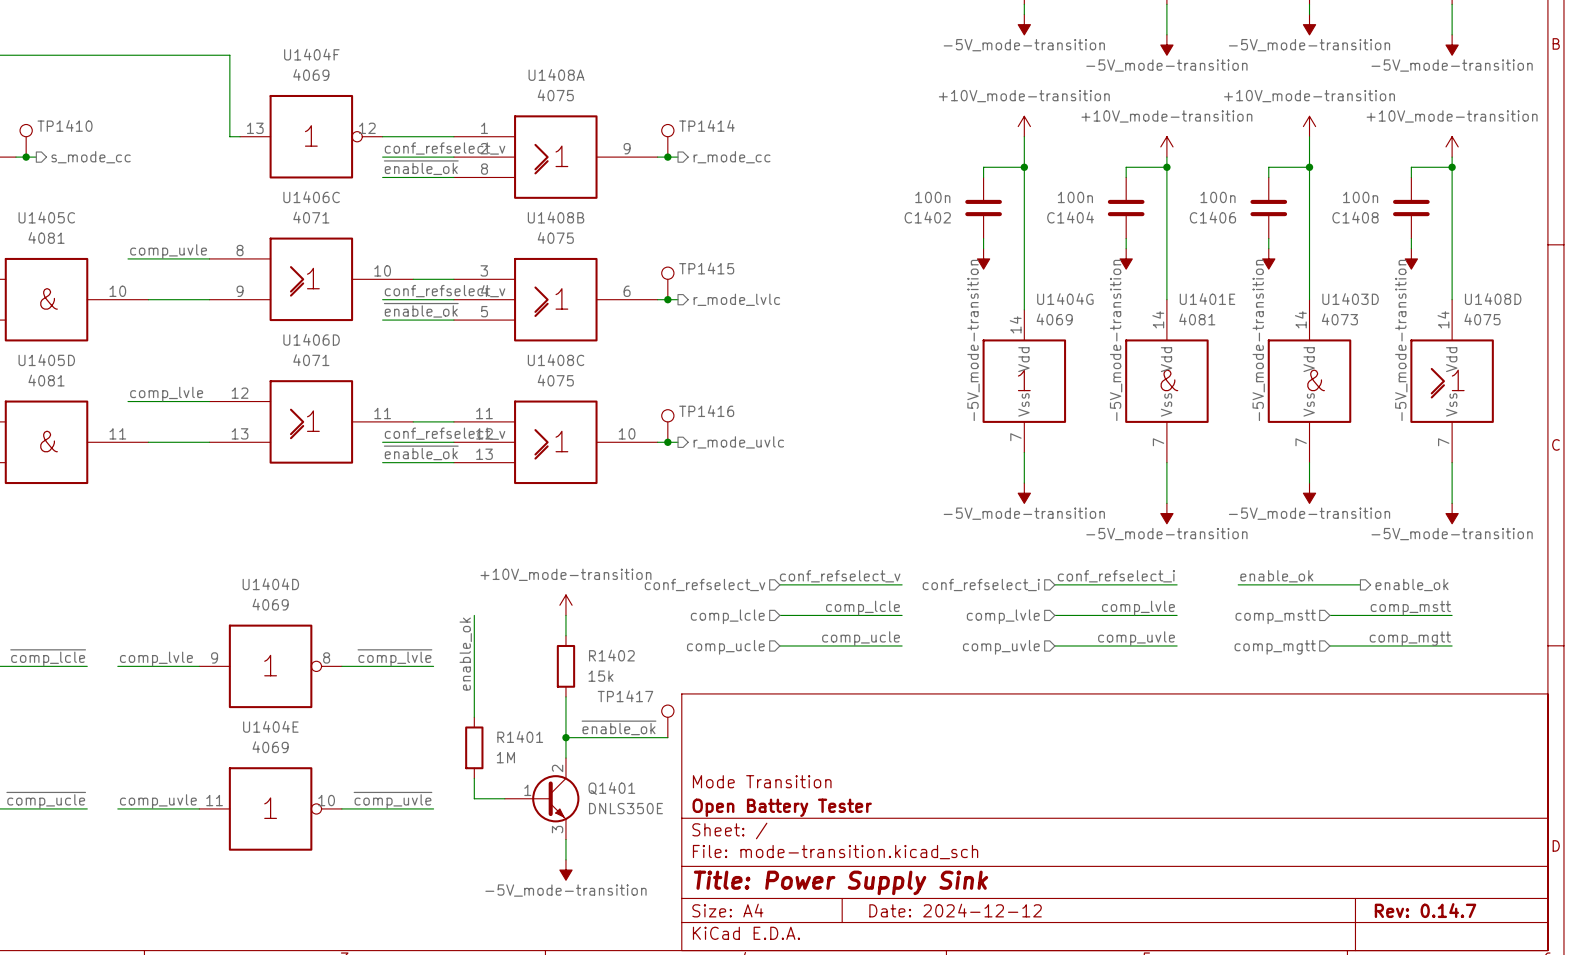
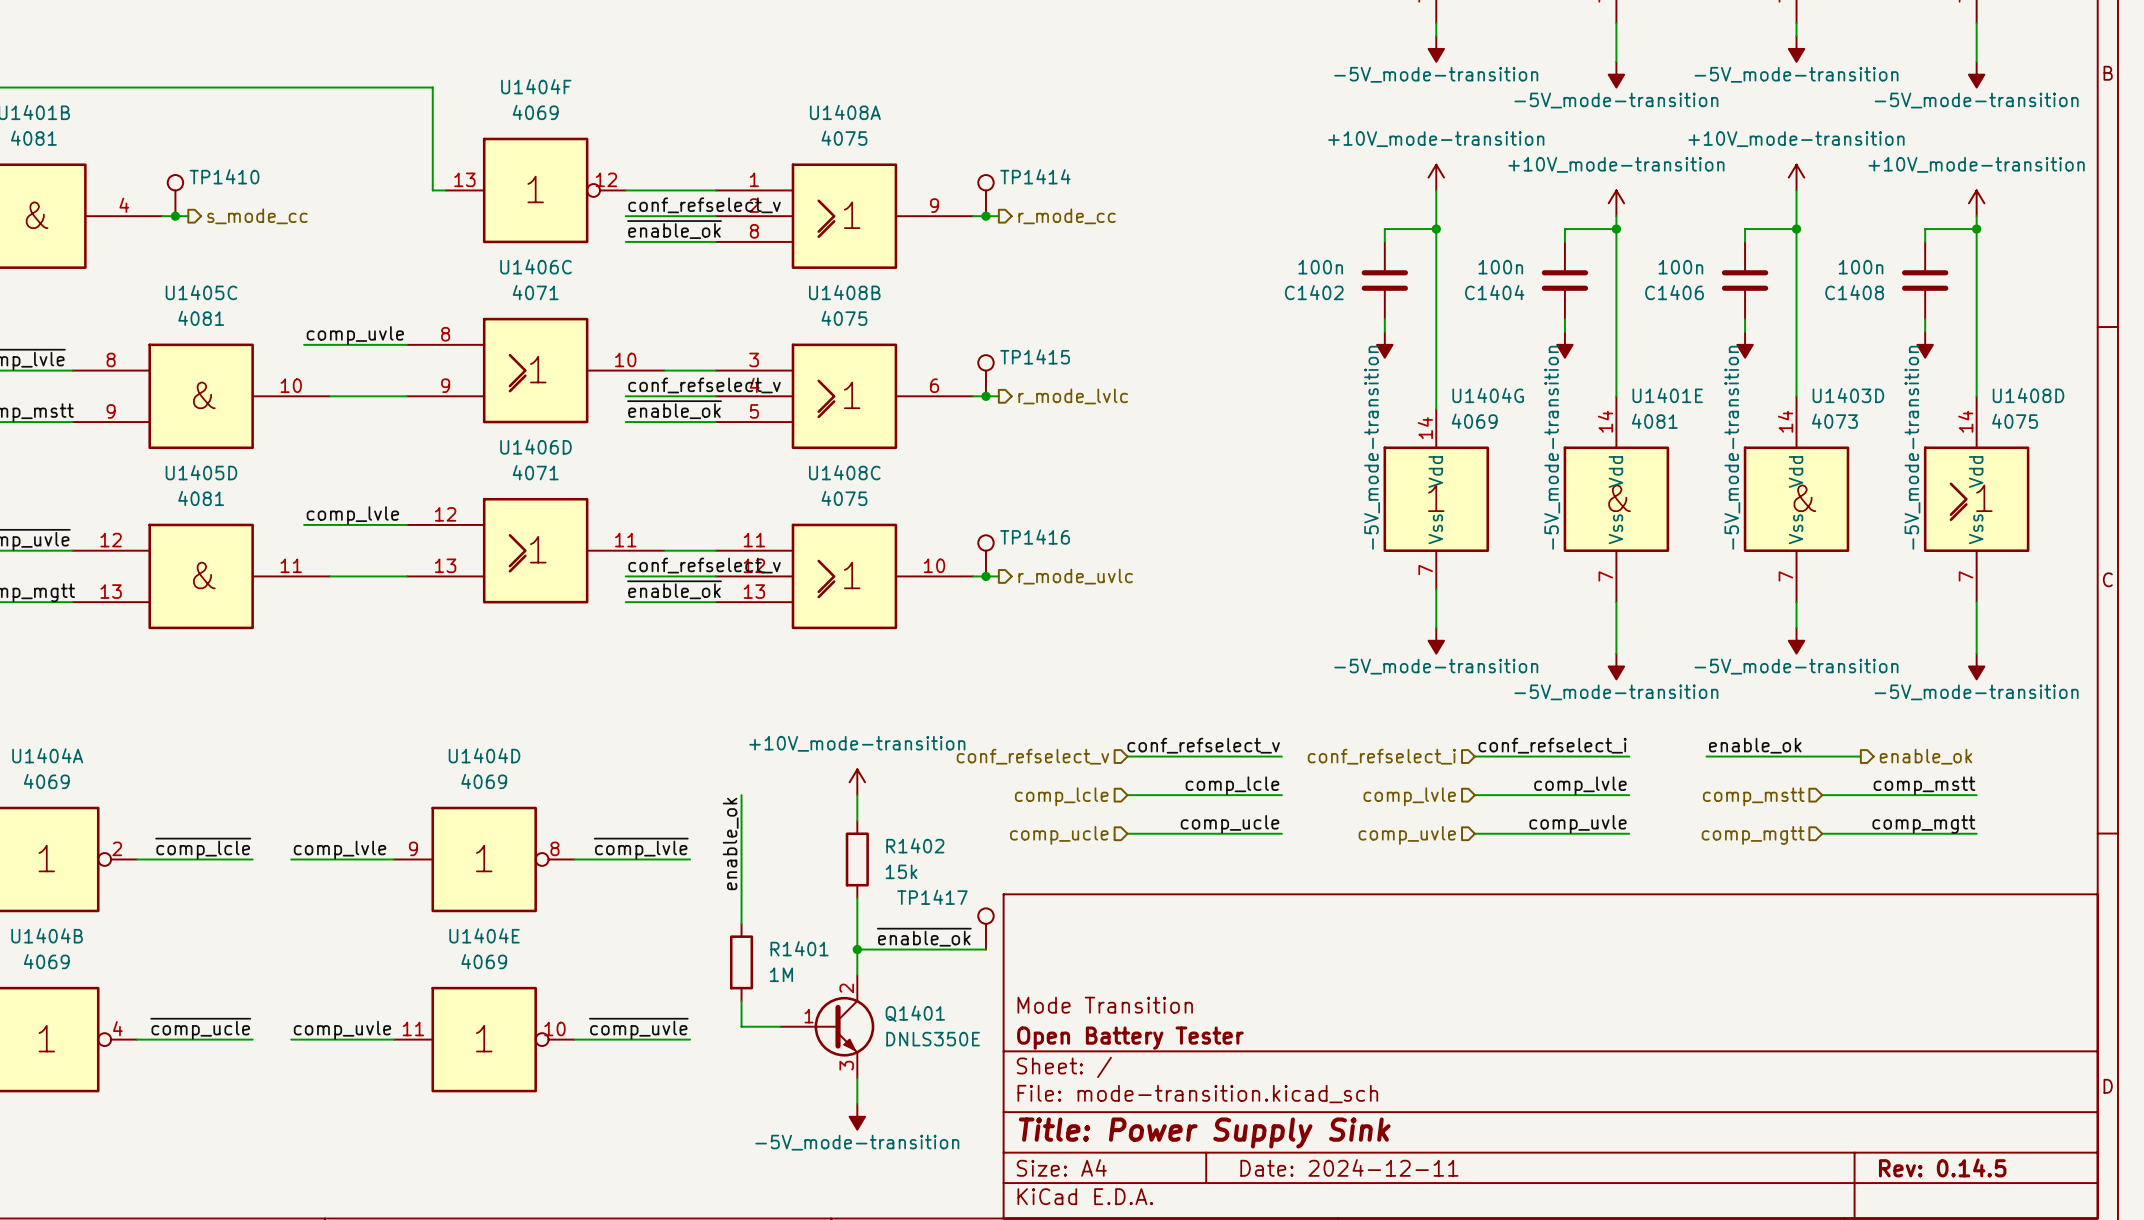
title block: Date: 2024-12-12 (955, 910) -> Date: 2024-12-11 (1349, 1167)
title block: Rev: 0.14.7 (1425, 910) -> Rev: 0.14.5 (1942, 1167)

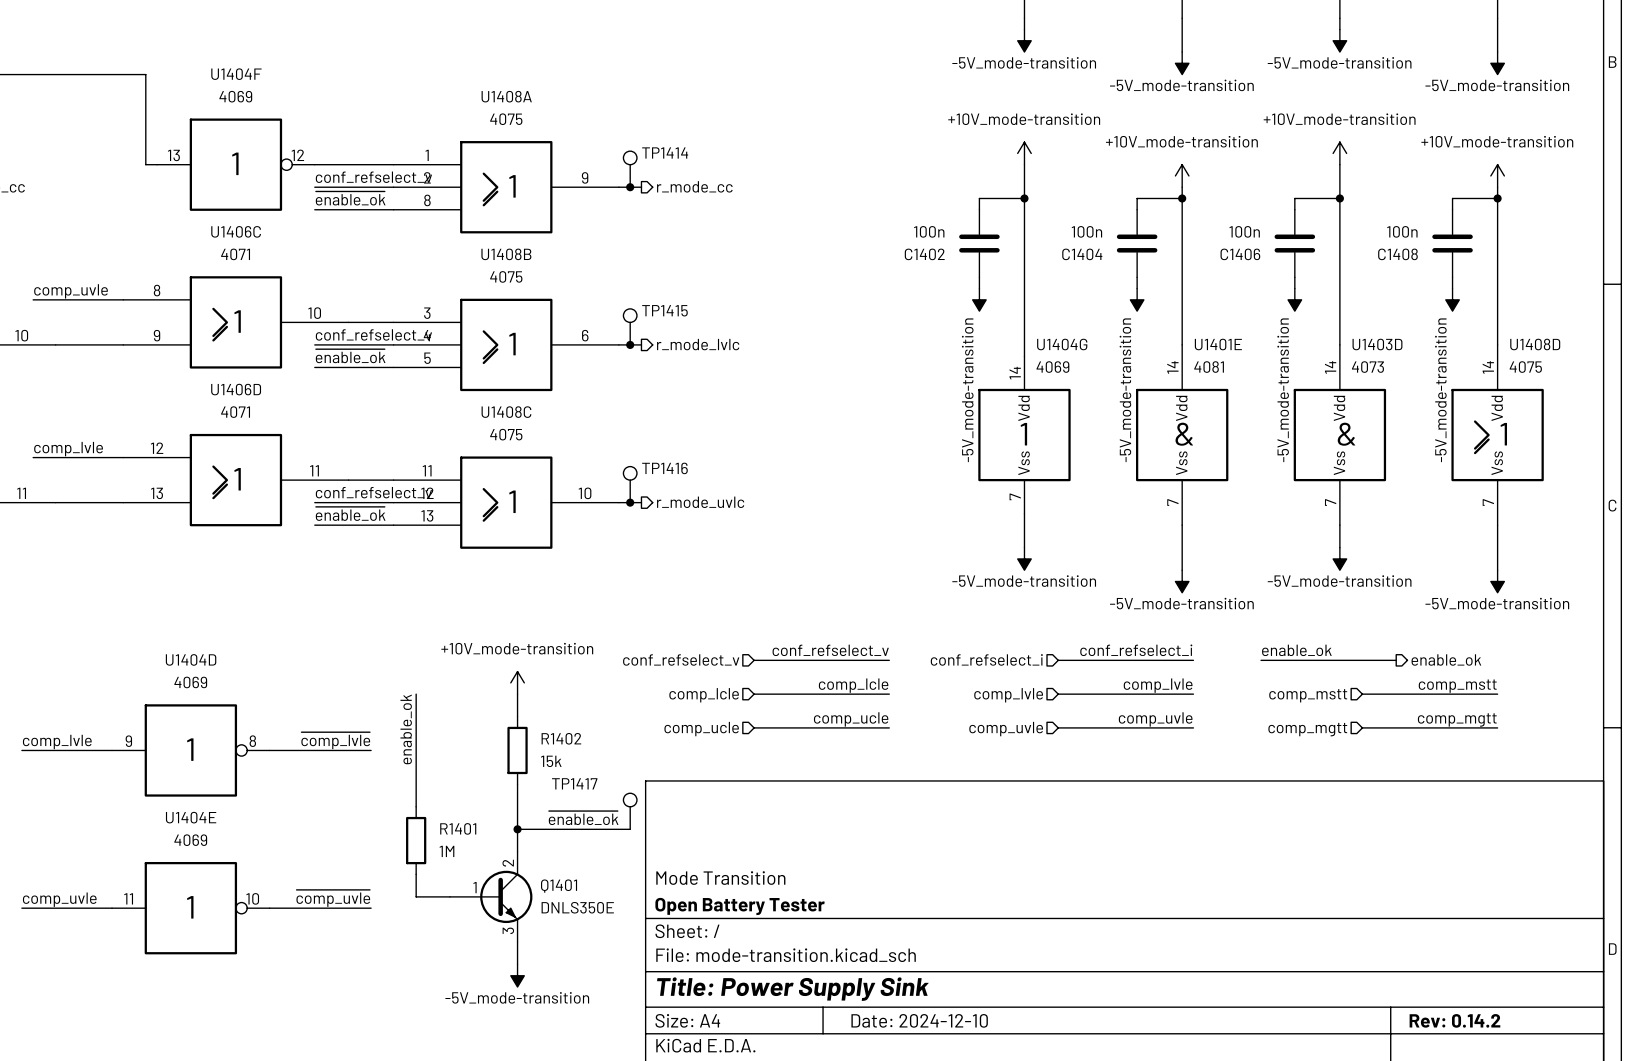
title block: Date: 2024-12-11 (1349, 1167) -> Date: 2024-12-10 (919, 1020)
title block: Rev: 0.14.5 (1942, 1167) -> Rev: 0.14.2 (1454, 1020)

